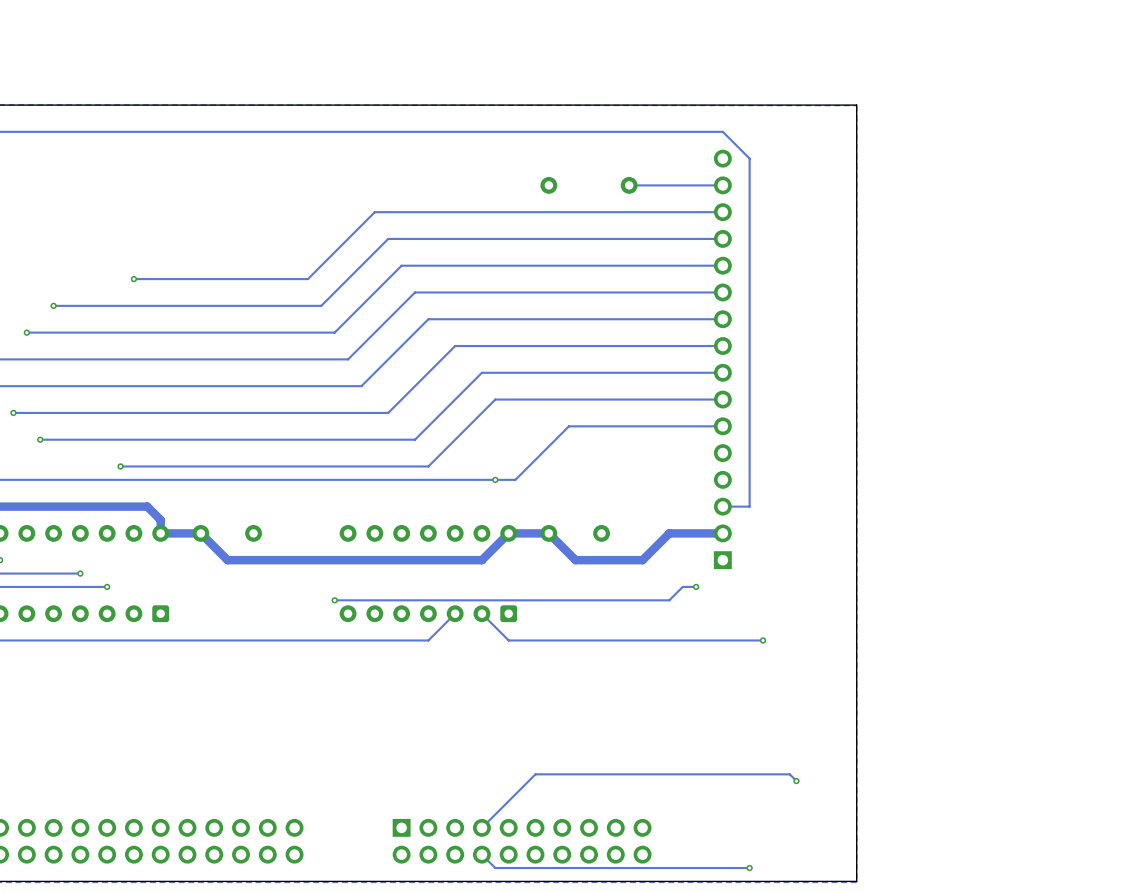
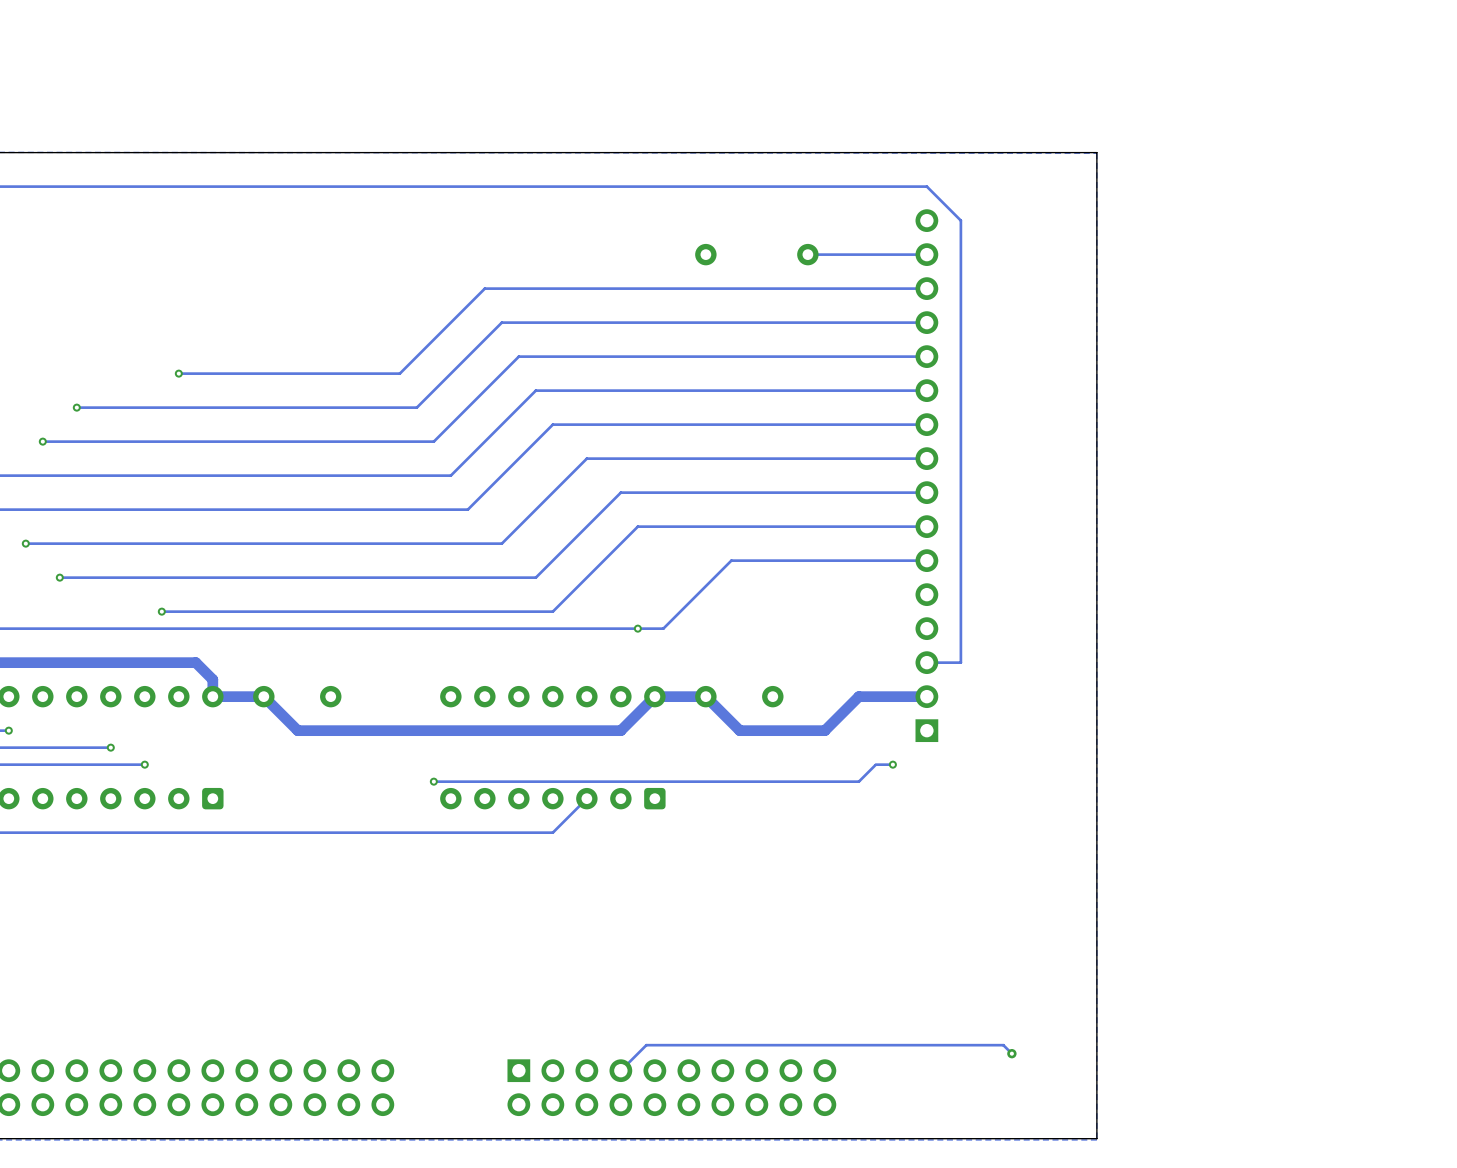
track: (481, 613) (508, 640) (763, 640) -> none
via: (763, 640) -> none
track: (796, 781) (789, 774) (535, 774) (502, 807) -> (1011, 1053) (1003, 1045) (646, 1045)
via: (796, 781) -> none
via: none -> (1011, 1053)
track: (481, 854) (495, 868) (749, 868) -> none
via: (749, 868) -> none

